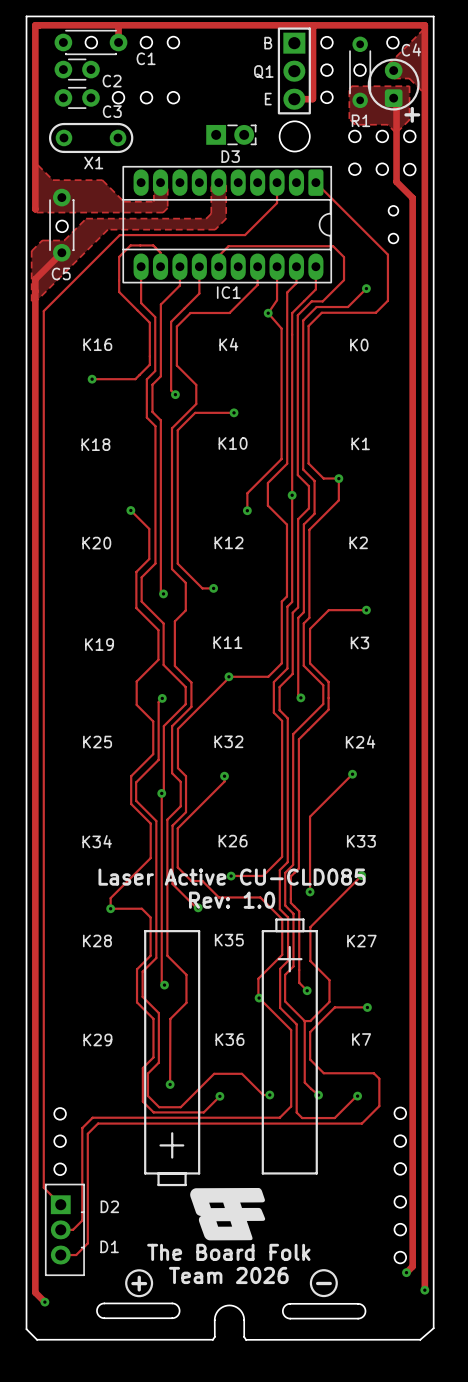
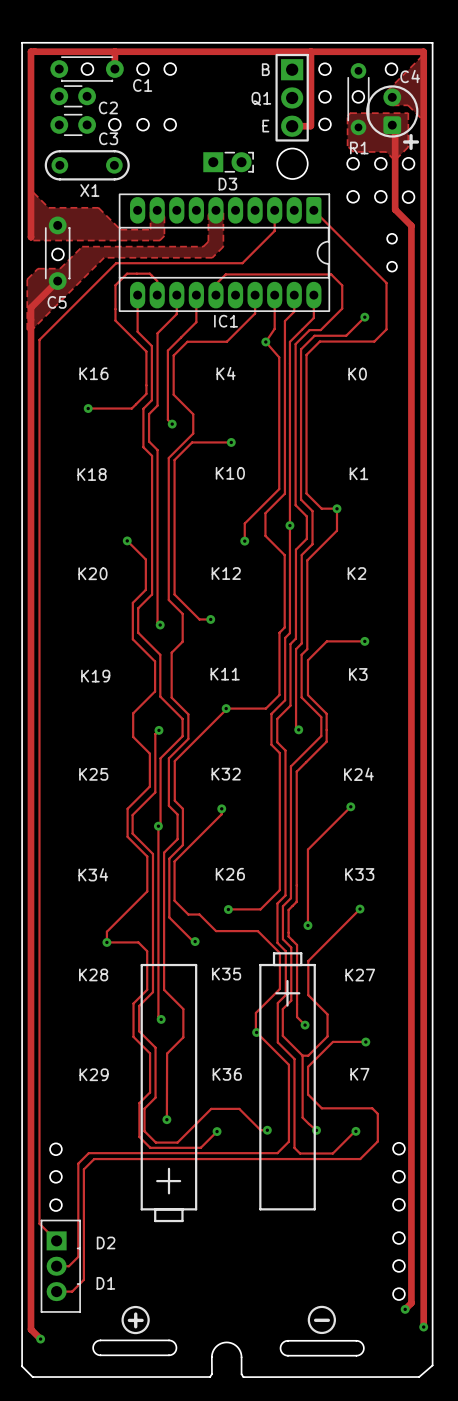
text: Laser Active CU-CLD085 (232, 877) -> none
text: Rev: 1.0 (232, 900) -> none
drawing: [190, 1187, 266, 1241] -> none
text: The Board Folk (228, 1252) -> none
text: Team 2026 (228, 1275) -> none

